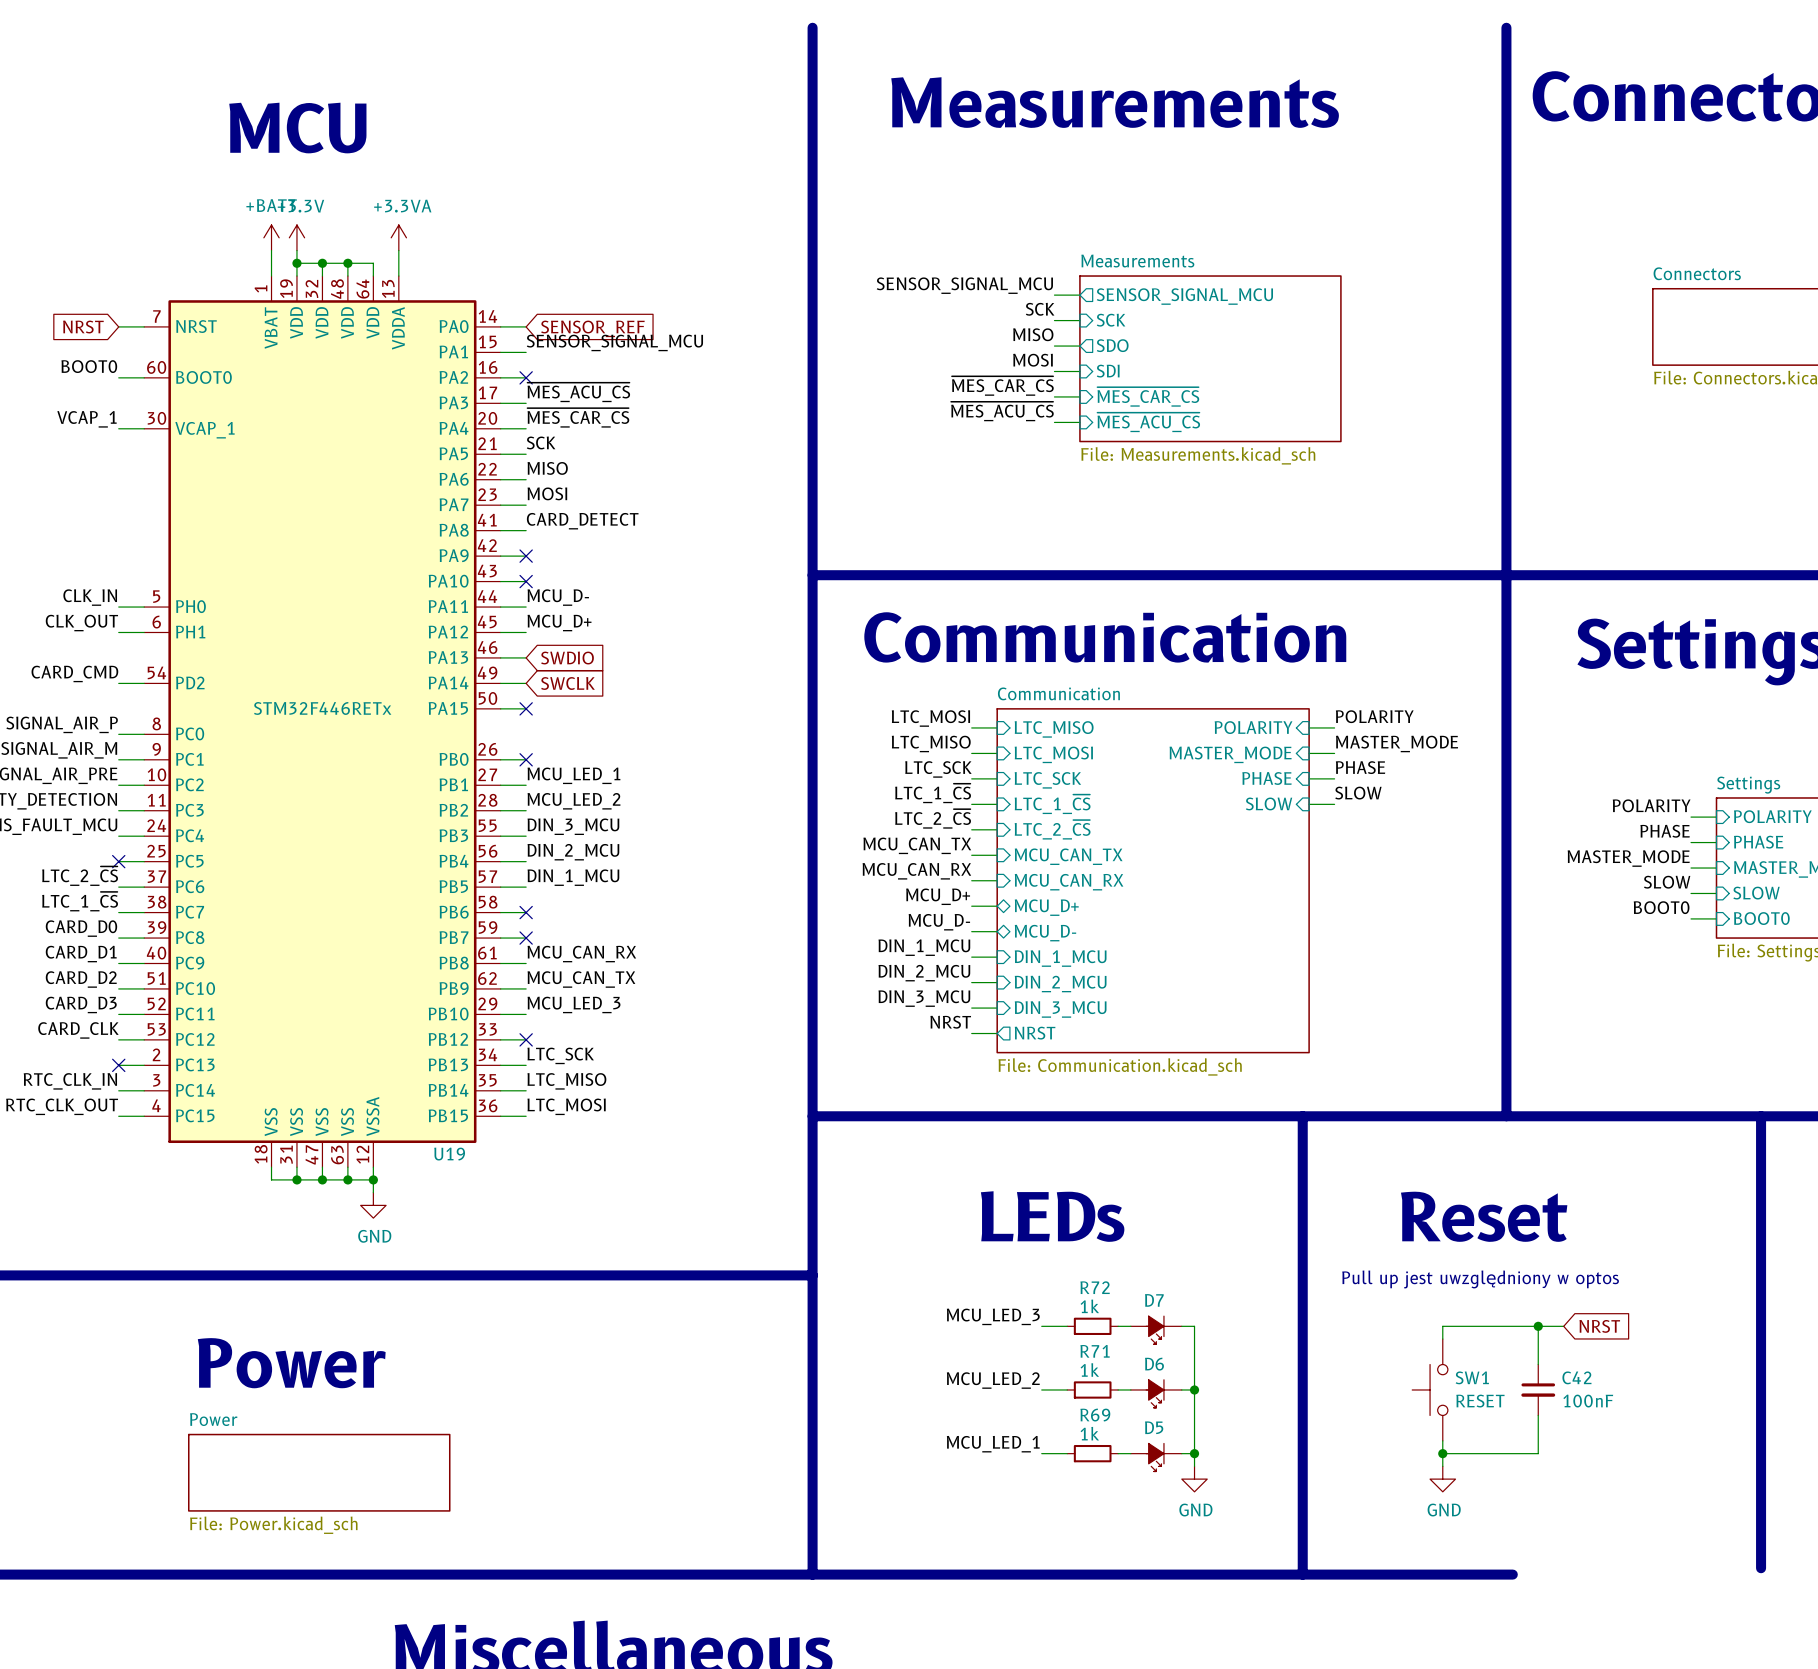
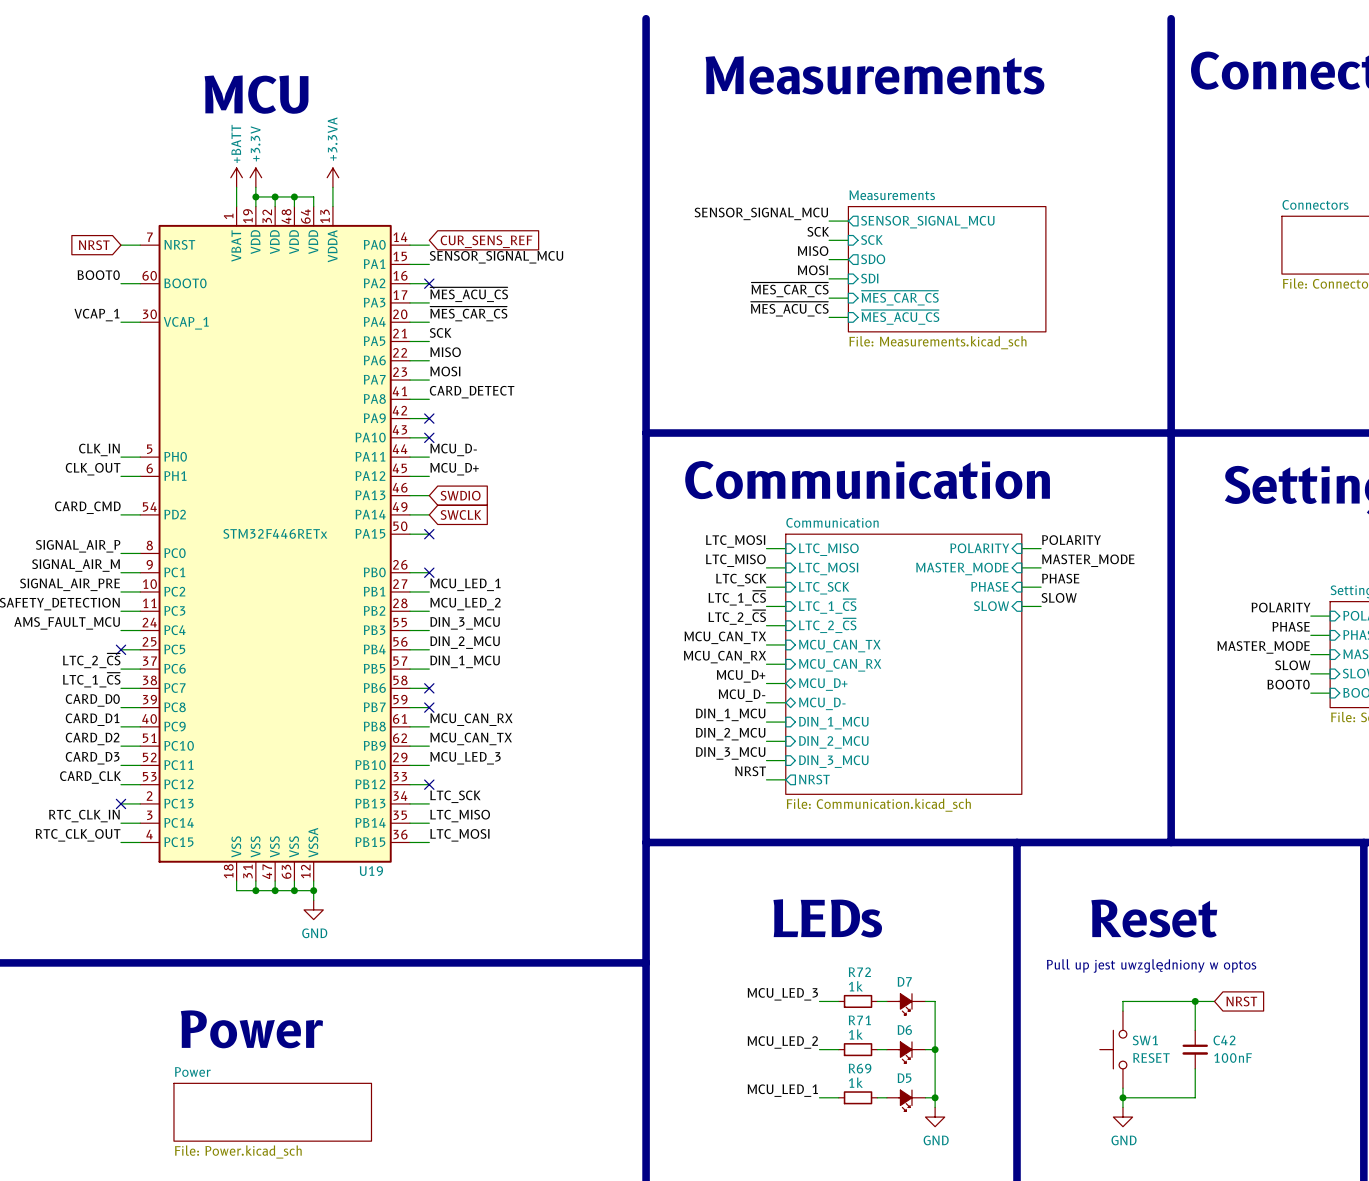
power symbol text rotation: 0° (271, 205) -> 90° counterclockwise (236, 143)
power symbol text rotation: 0° (300, 206) -> 90° counterclockwise (255, 143)
power symbol text rotation: 0° (402, 206) -> 90° counterclockwise (332, 139)
global label: SENSOR_REF (592, 328) -> CUR_SENS_REF (486, 241)

